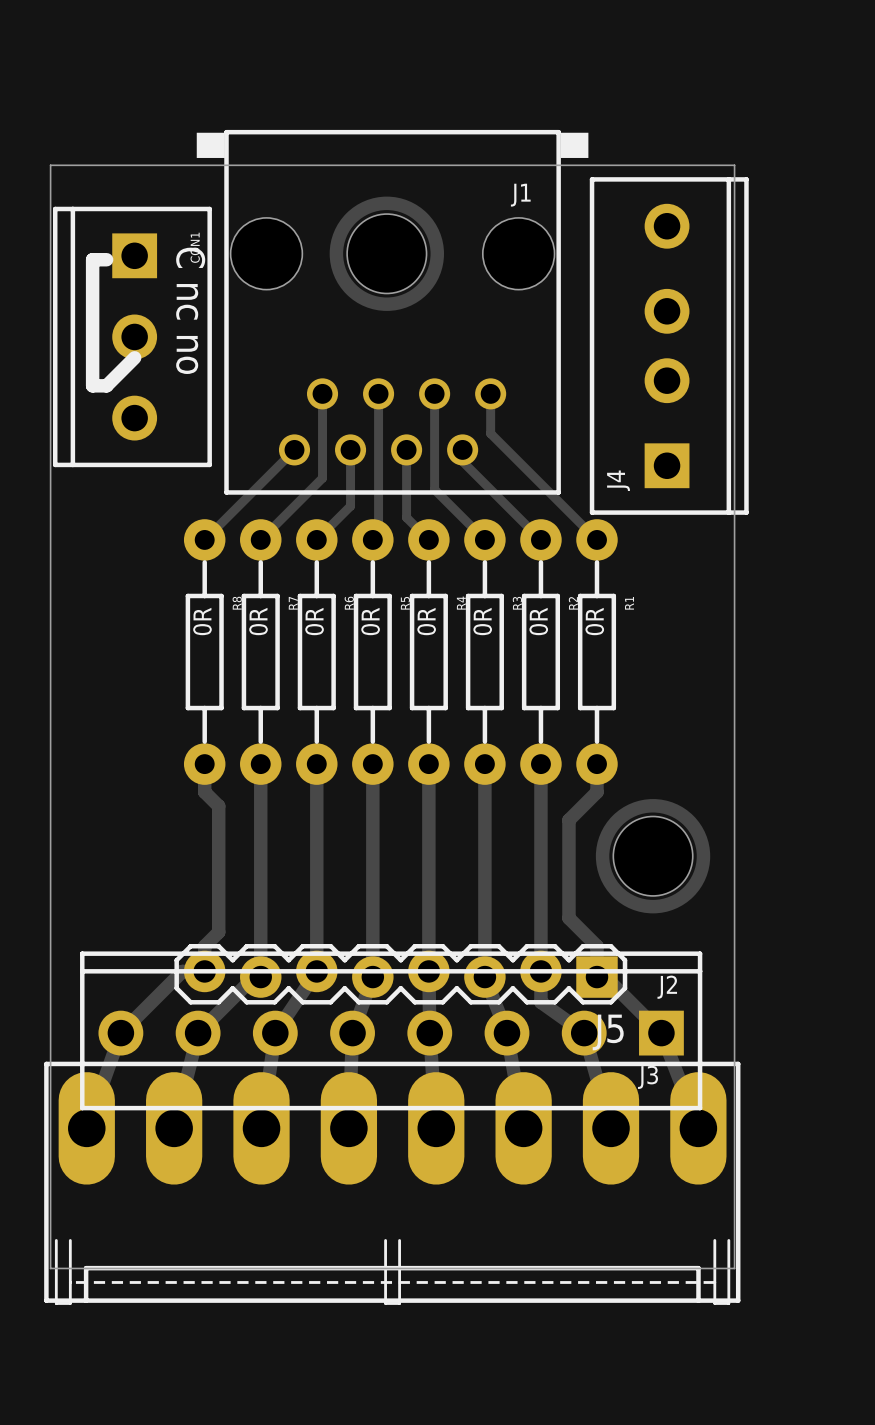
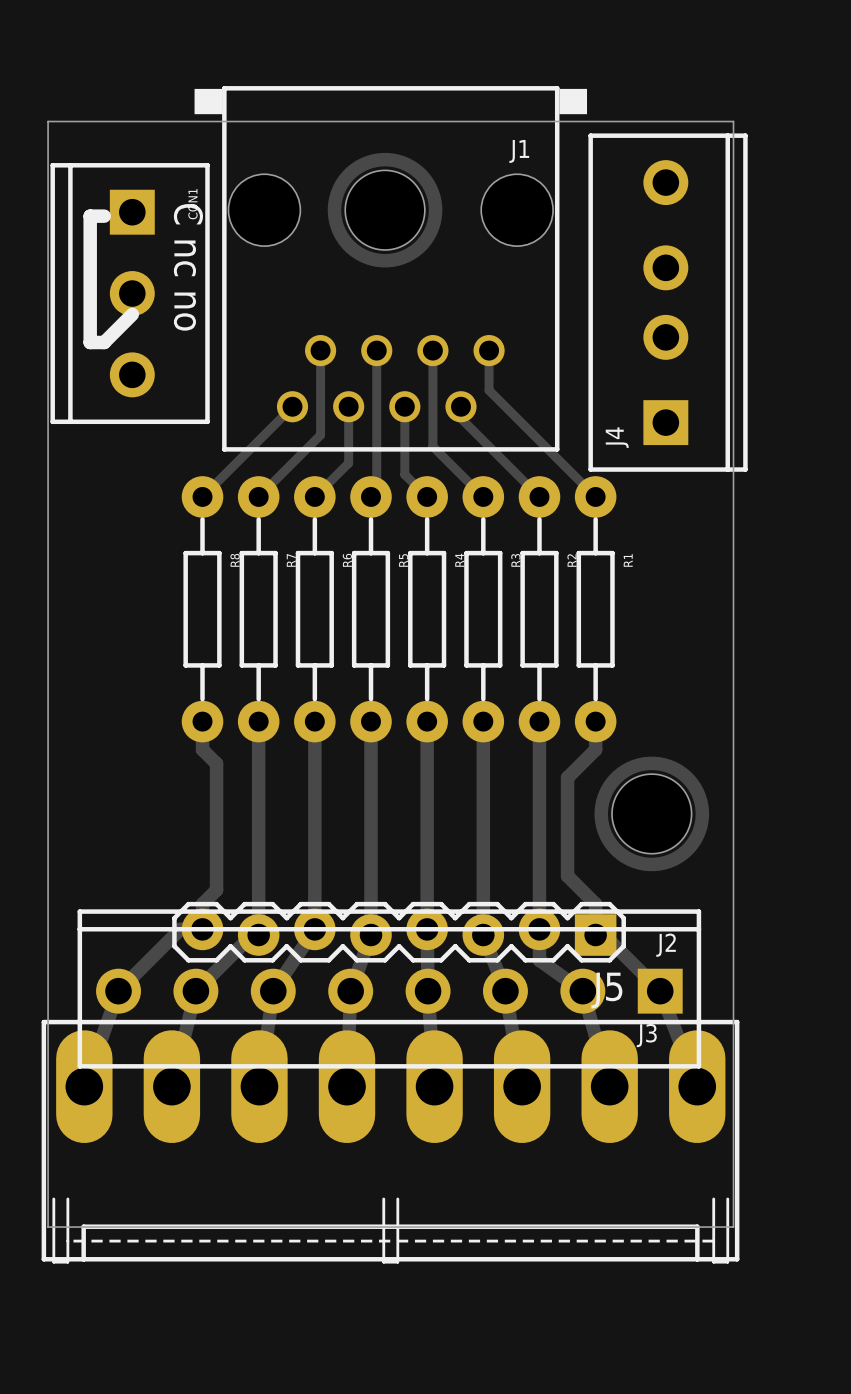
R8 value: 0R (202, 621) -> none
R7 value: 0R (258, 621) -> none
R6 value: 0R (314, 621) -> none
R5 value: 0R (370, 621) -> none
R4 value: 0R (426, 621) -> none
R3 value: 0R (482, 621) -> none
R2 value: 0R (538, 621) -> none
R1 value: 0R (594, 621) -> none

